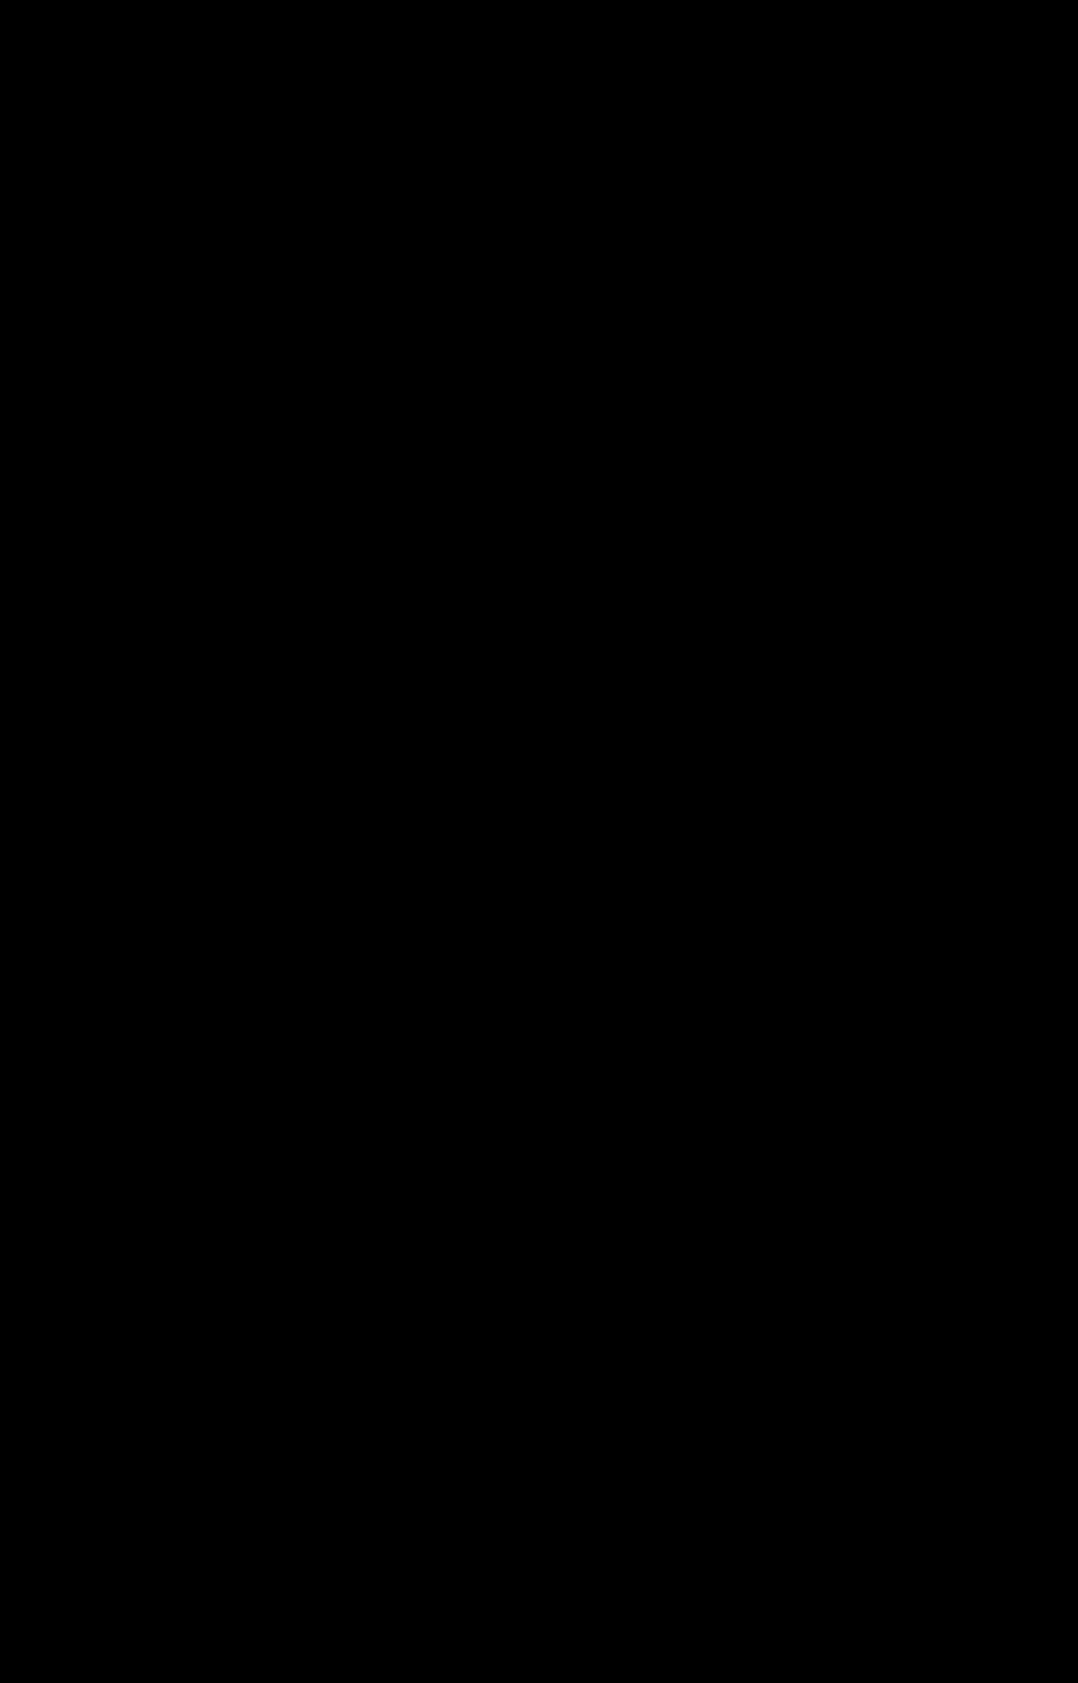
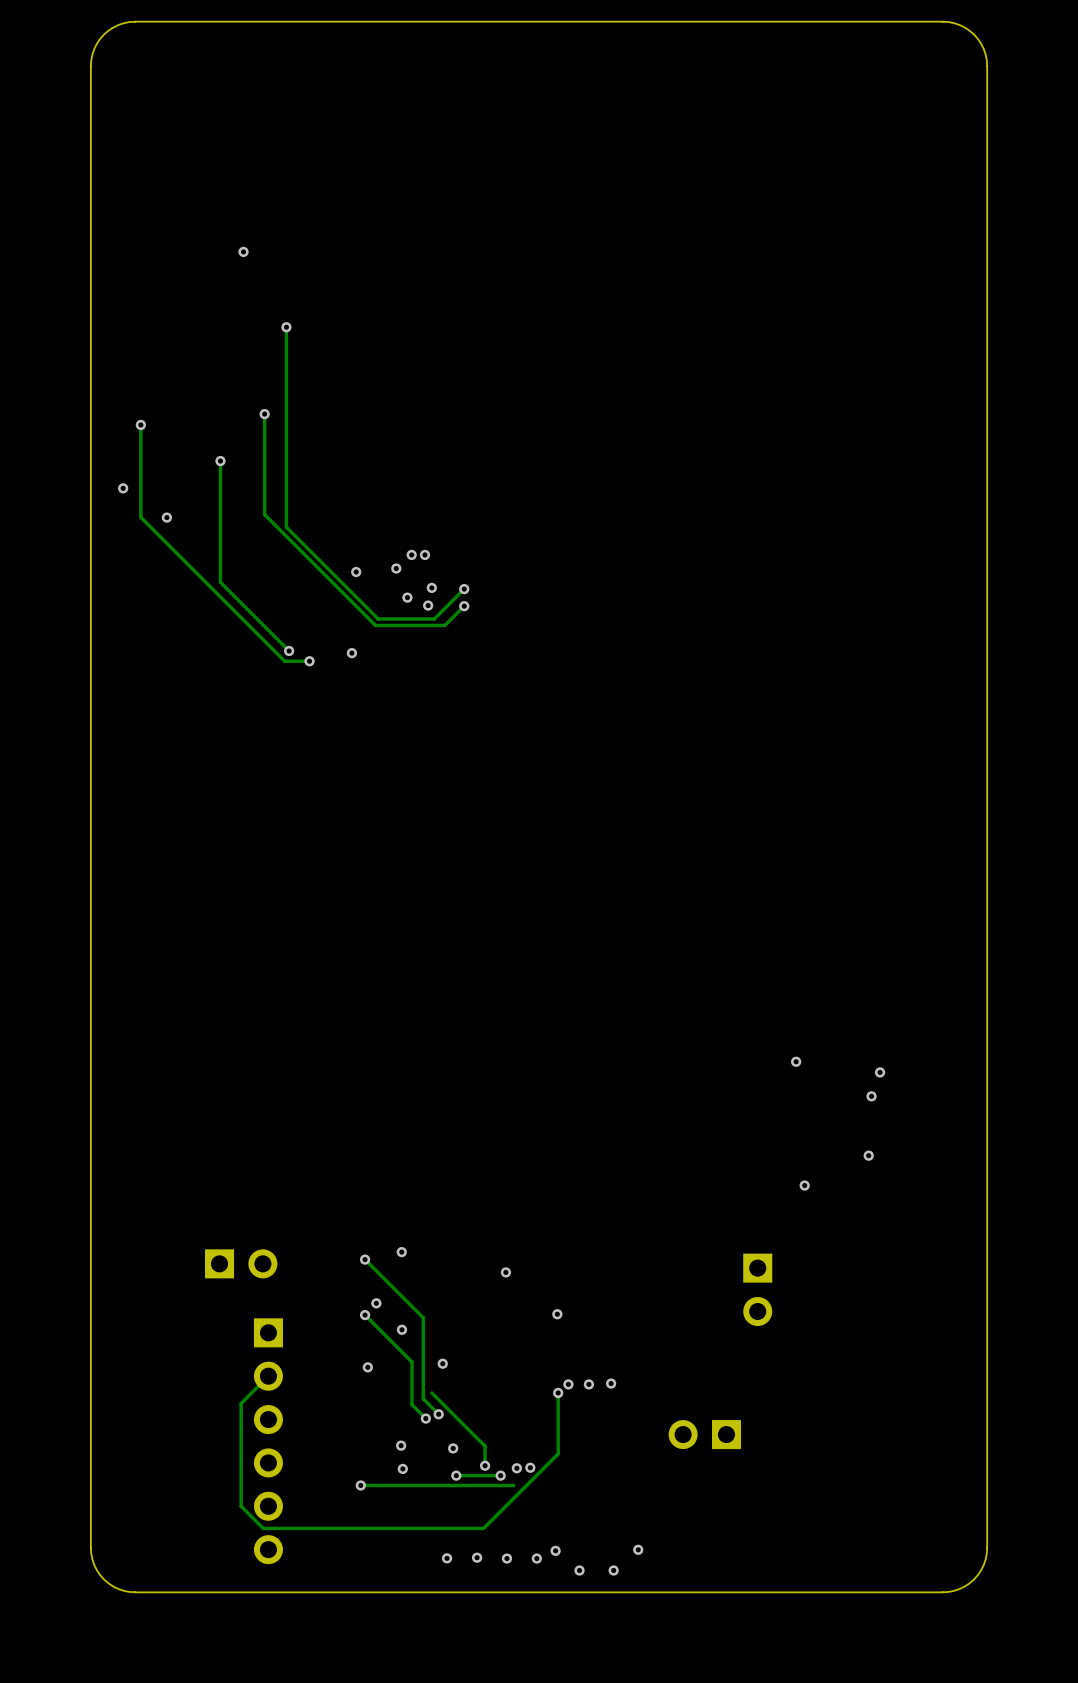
board edge: none -> (942, 21) (135, 21) (123, 23) (113, 27) (103, 34) (96, 43) (92, 54) (90, 66) (90, 1547) (92, 1559) (96, 1570) (103, 1579) (113, 1586) (123, 1590) (135, 1592) (942, 1592) (954, 1590) (964, 1586) (974, 1579) (981, 1570) (985, 1559) (987, 1547) (987, 66) (983, 49) (974, 34) (959, 25) (942, 21)
via: none -> (243, 251)
track: none -> (286, 327) (286, 527) (378, 618) (434, 618) (464, 589)
via: none -> (286, 327)
track: none -> (264, 414) (264, 514) (375, 625) (444, 625) (464, 606)
via: none -> (264, 414)
track: none -> (140, 424) (140, 517) (284, 661) (309, 661)
via: none -> (140, 424)
track: none -> (220, 461) (220, 582) (289, 650)
via: none -> (220, 461)
via: none -> (123, 488)
via: none -> (166, 517)
via: none -> (411, 554)
via: none -> (424, 554)
via: none -> (396, 568)
via: none -> (356, 572)
via: none -> (431, 587)
via: none -> (464, 589)
via: none -> (407, 597)
via: none -> (428, 605)
via: none -> (464, 606)
via: none -> (289, 650)
via: none -> (351, 653)
via: none -> (309, 661)
via: none -> (796, 1061)
via: none -> (880, 1072)
via: none -> (871, 1096)
via: none -> (868, 1155)
via: none -> (804, 1185)
via: none -> (401, 1252)
track: none -> (365, 1259) (423, 1317) (423, 1398) (438, 1414)
via: none -> (365, 1259)
part: none -> (241, 1263)
via: none -> (505, 1272)
part: none -> (757, 1289)
via: none -> (376, 1303)
via: none -> (557, 1314)
track: none -> (365, 1315) (412, 1362) (412, 1404) (425, 1418)
via: none -> (365, 1315)
via: none -> (401, 1329)
via: none -> (442, 1363)
via: none -> (367, 1367)
track: none -> (268, 1376) (241, 1403) (241, 1506) (263, 1528) (483, 1528) (558, 1453) (558, 1392)
via: none -> (611, 1383)
via: none -> (568, 1384)
via: none -> (588, 1384)
track: none -> (431, 1392) (485, 1446) (485, 1465)
via: none -> (558, 1392)
via: none -> (438, 1414)
via: none -> (425, 1418)
part: none -> (704, 1434)
part: none -> (268, 1441)
via: none -> (401, 1445)
via: none -> (453, 1448)
via: none -> (485, 1465)
via: none -> (530, 1467)
via: none -> (402, 1468)
via: none -> (516, 1468)
via: none -> (456, 1475)
track: none -> (500, 1475) (456, 1475)
via: none -> (500, 1475)
via: none -> (360, 1485)
track: none -> (513, 1485) (360, 1485)
via: none -> (638, 1549)
via: none -> (555, 1550)
via: none -> (477, 1557)
via: none -> (447, 1558)
via: none -> (506, 1558)
via: none -> (536, 1558)
via: none -> (579, 1570)
via: none -> (613, 1570)

